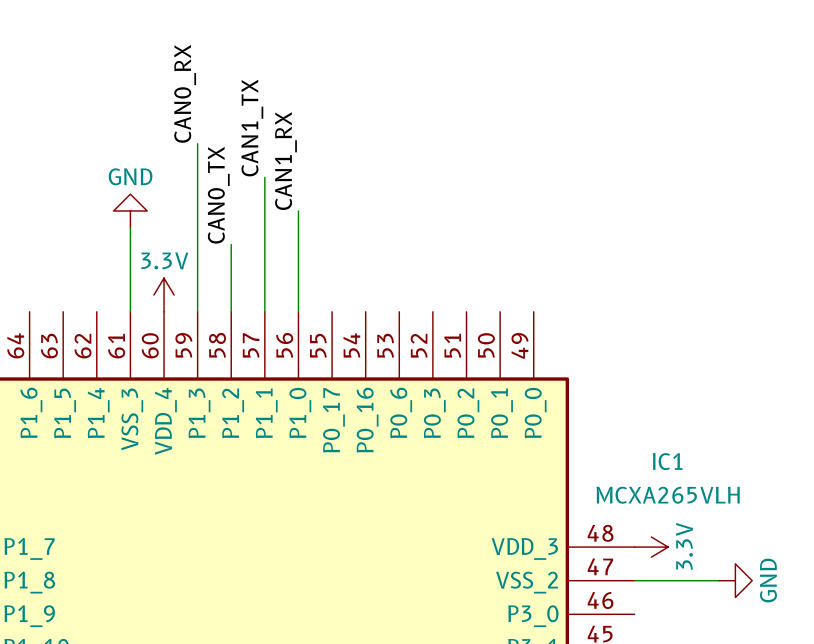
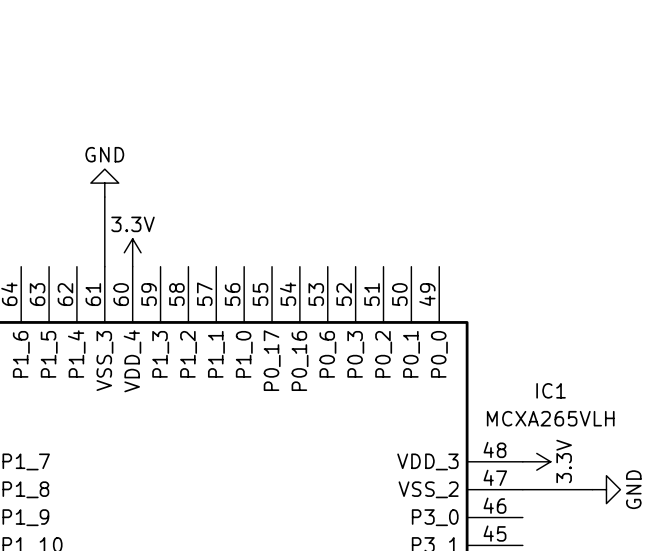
label: CAN0_RX (185, 93) -> none
label: CAN1_TX (252, 128) -> none
wire: (197, 143) (197, 311) -> none
label: CAN1_RX (285, 161) -> none
wire: (264, 177) (264, 311) -> none
label: CAN0_TX (218, 195) -> none
wire: (298, 210) (298, 311) -> none
wire: (231, 244) (231, 311) -> none

